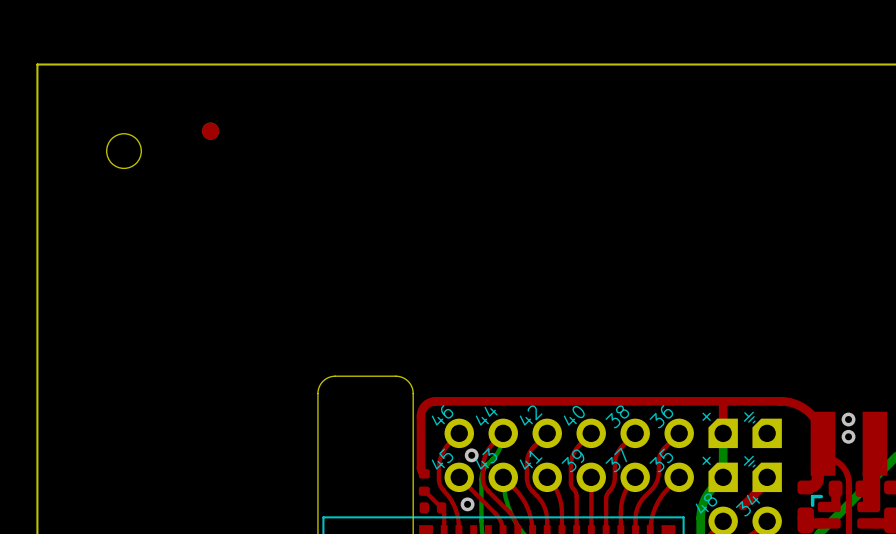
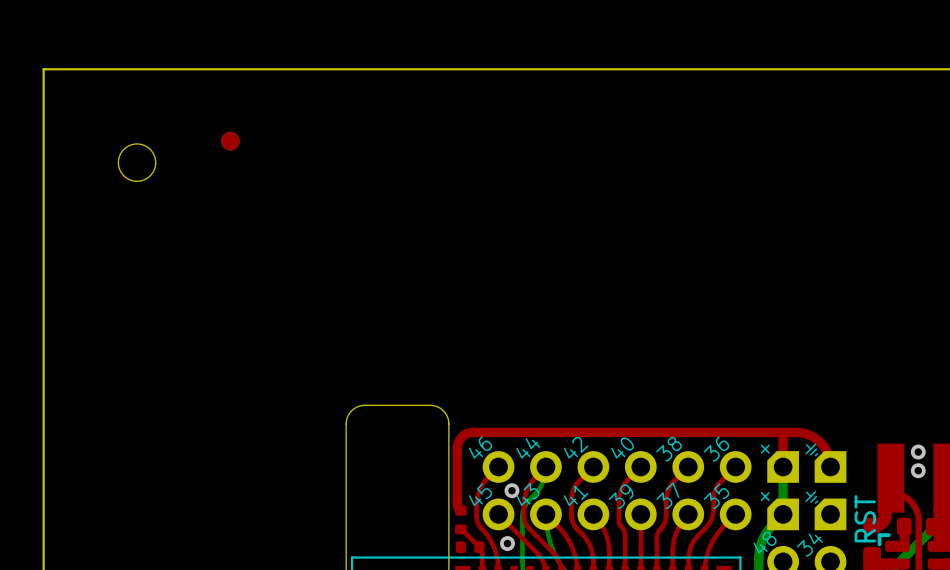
top track: (735, 401) (785, 401) (798, 405) (807, 410) (816, 421) (821, 434) (823, 443) -> (796, 432) (810, 435) (820, 442) (827, 451) (830, 466)
top track: (767, 481) (742, 506) -> none
text: none -> RST (865, 518)

